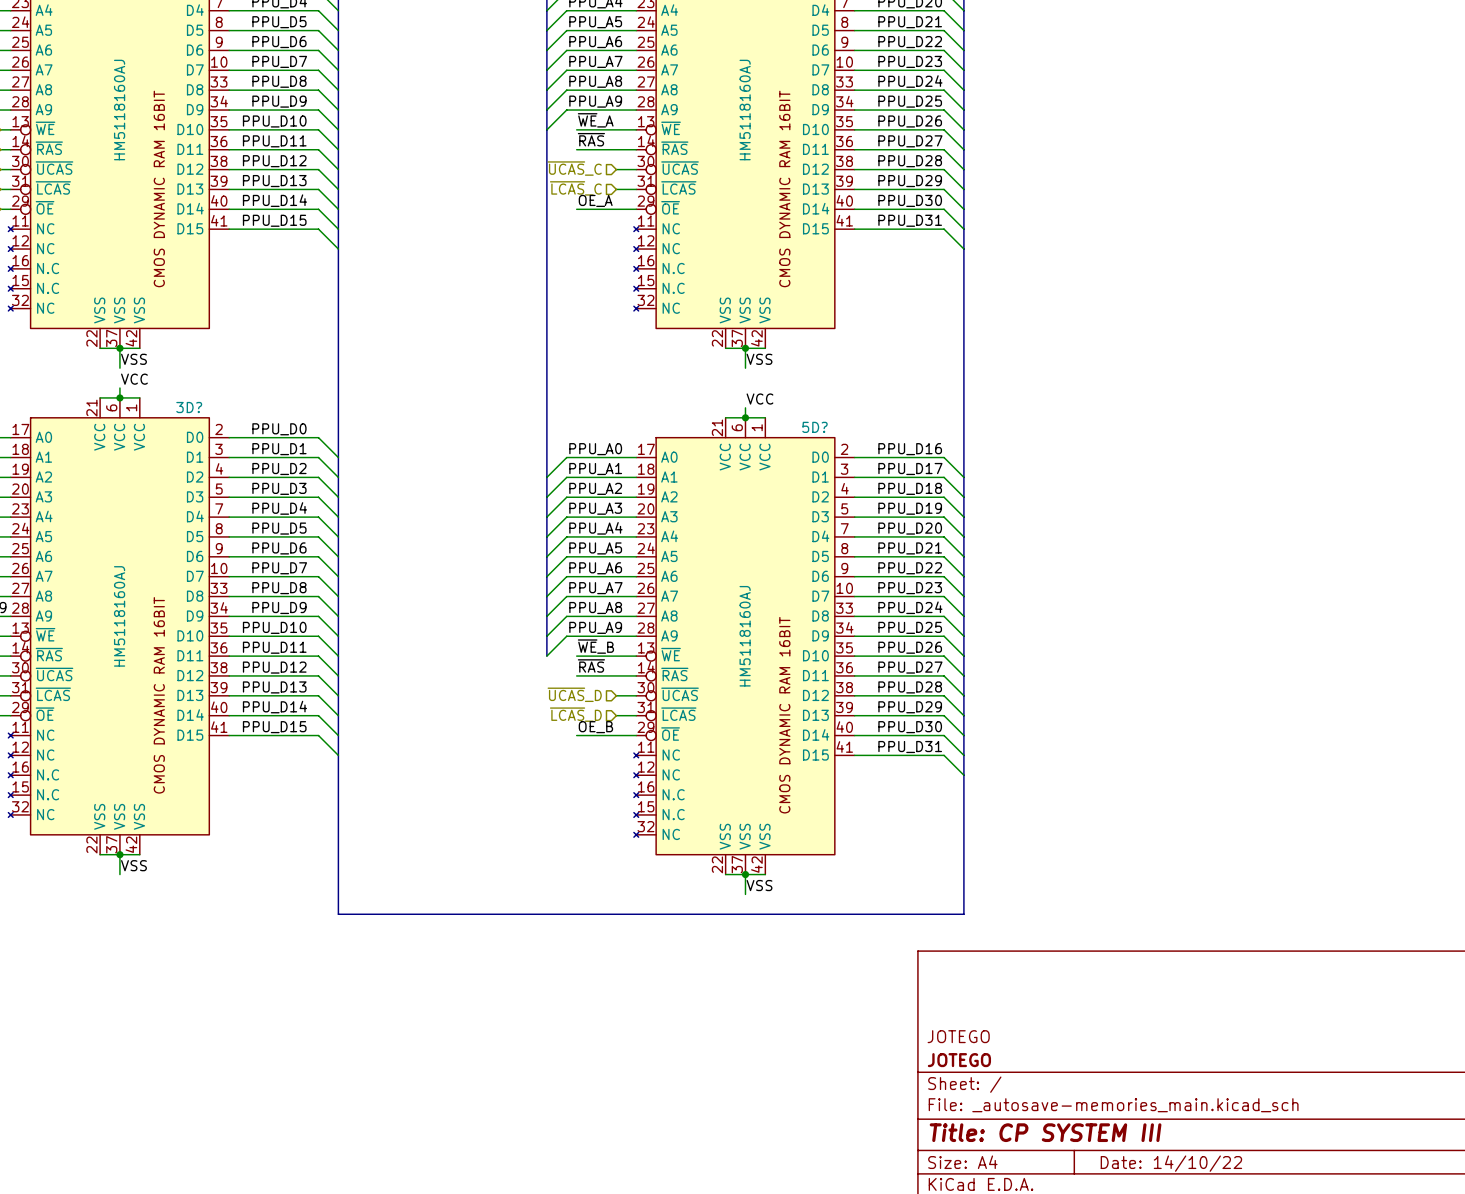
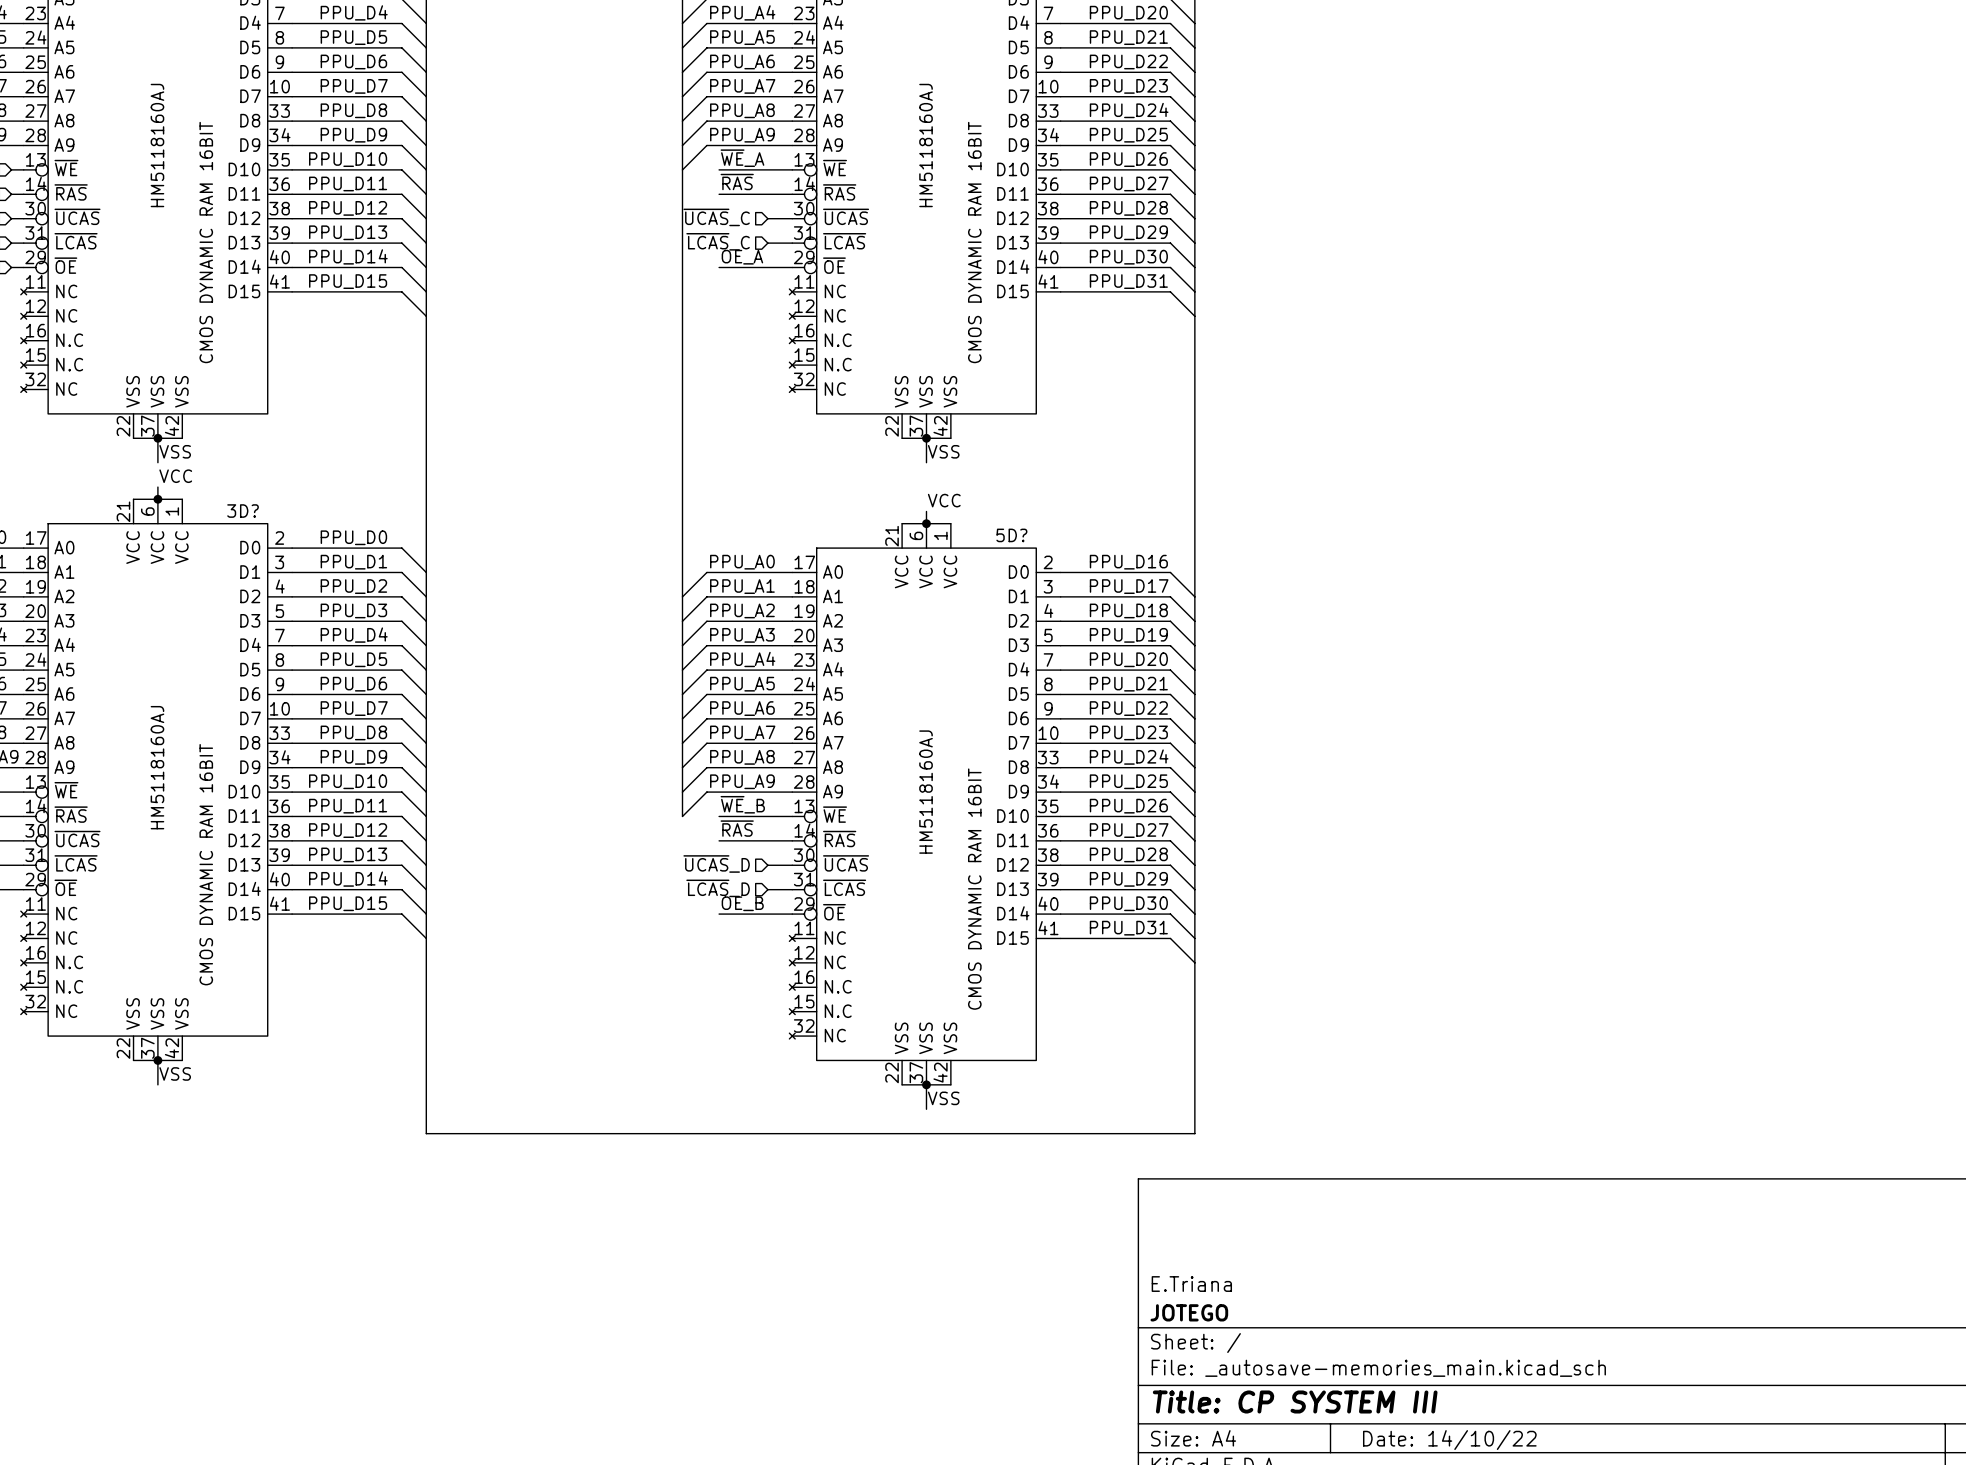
title block: JOTEGO (958, 1036) -> E.Triana (1191, 1284)

